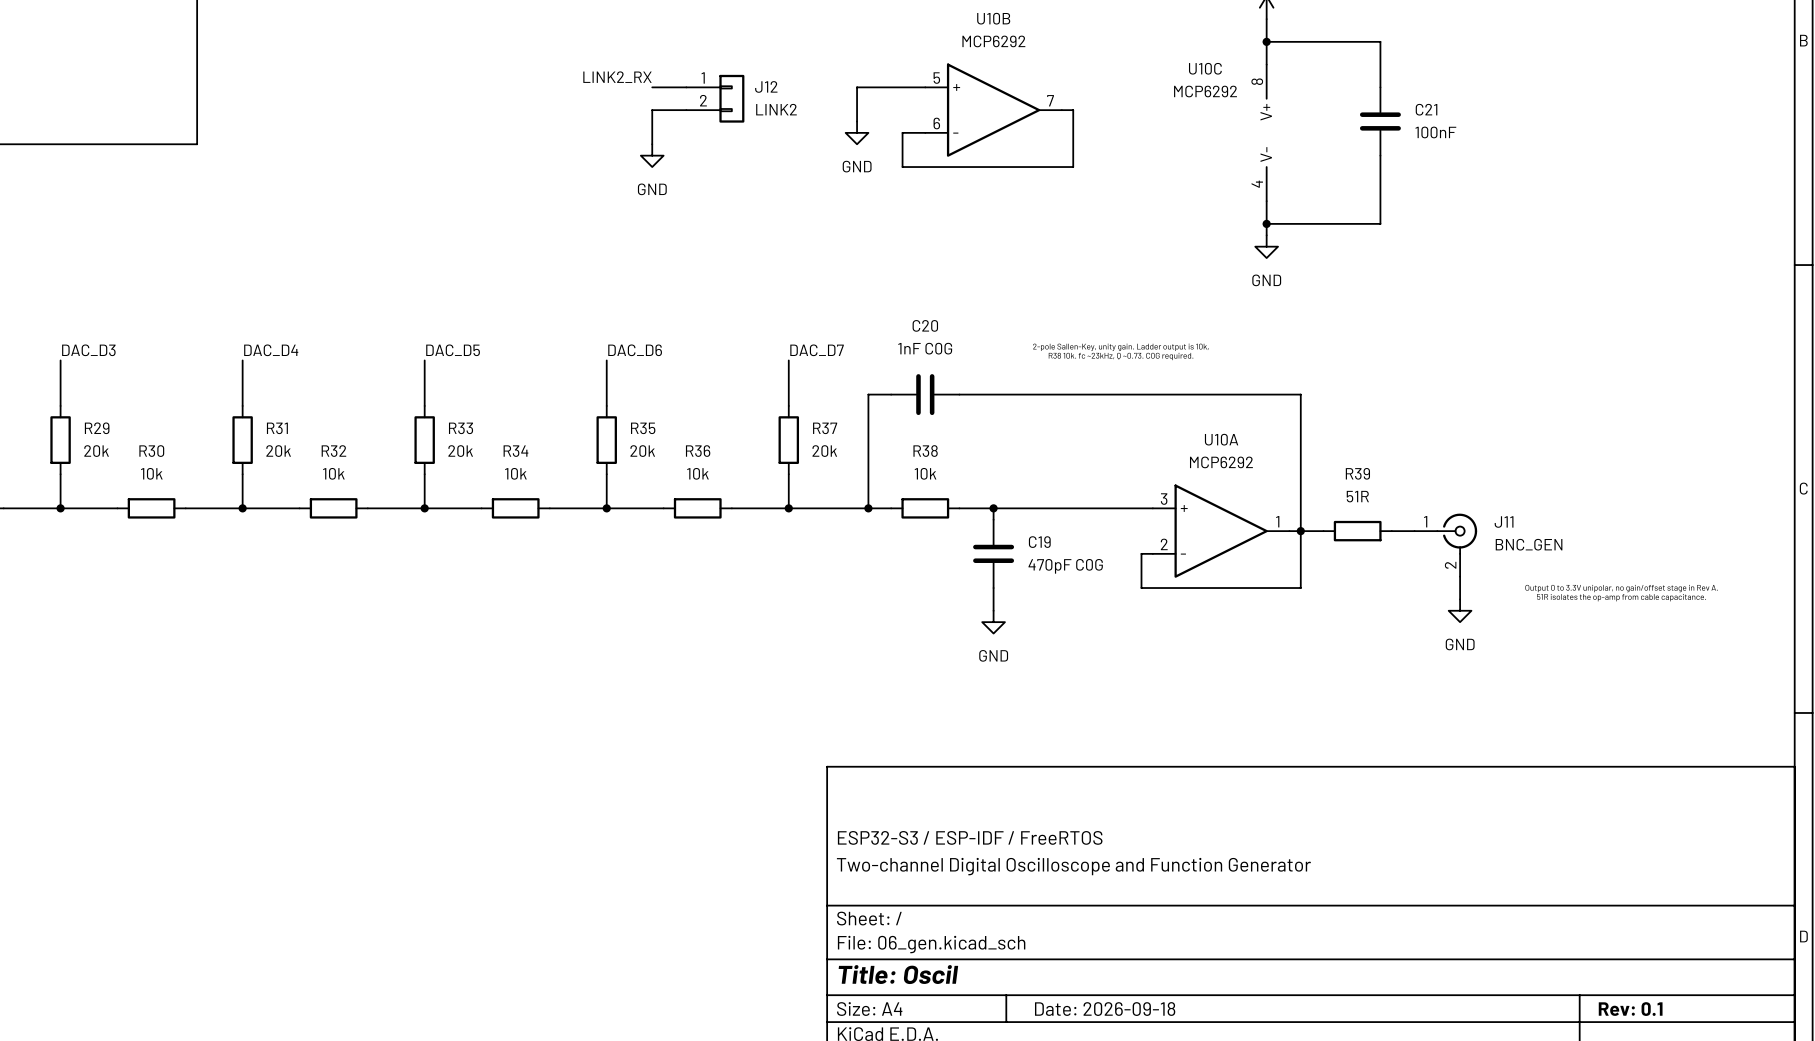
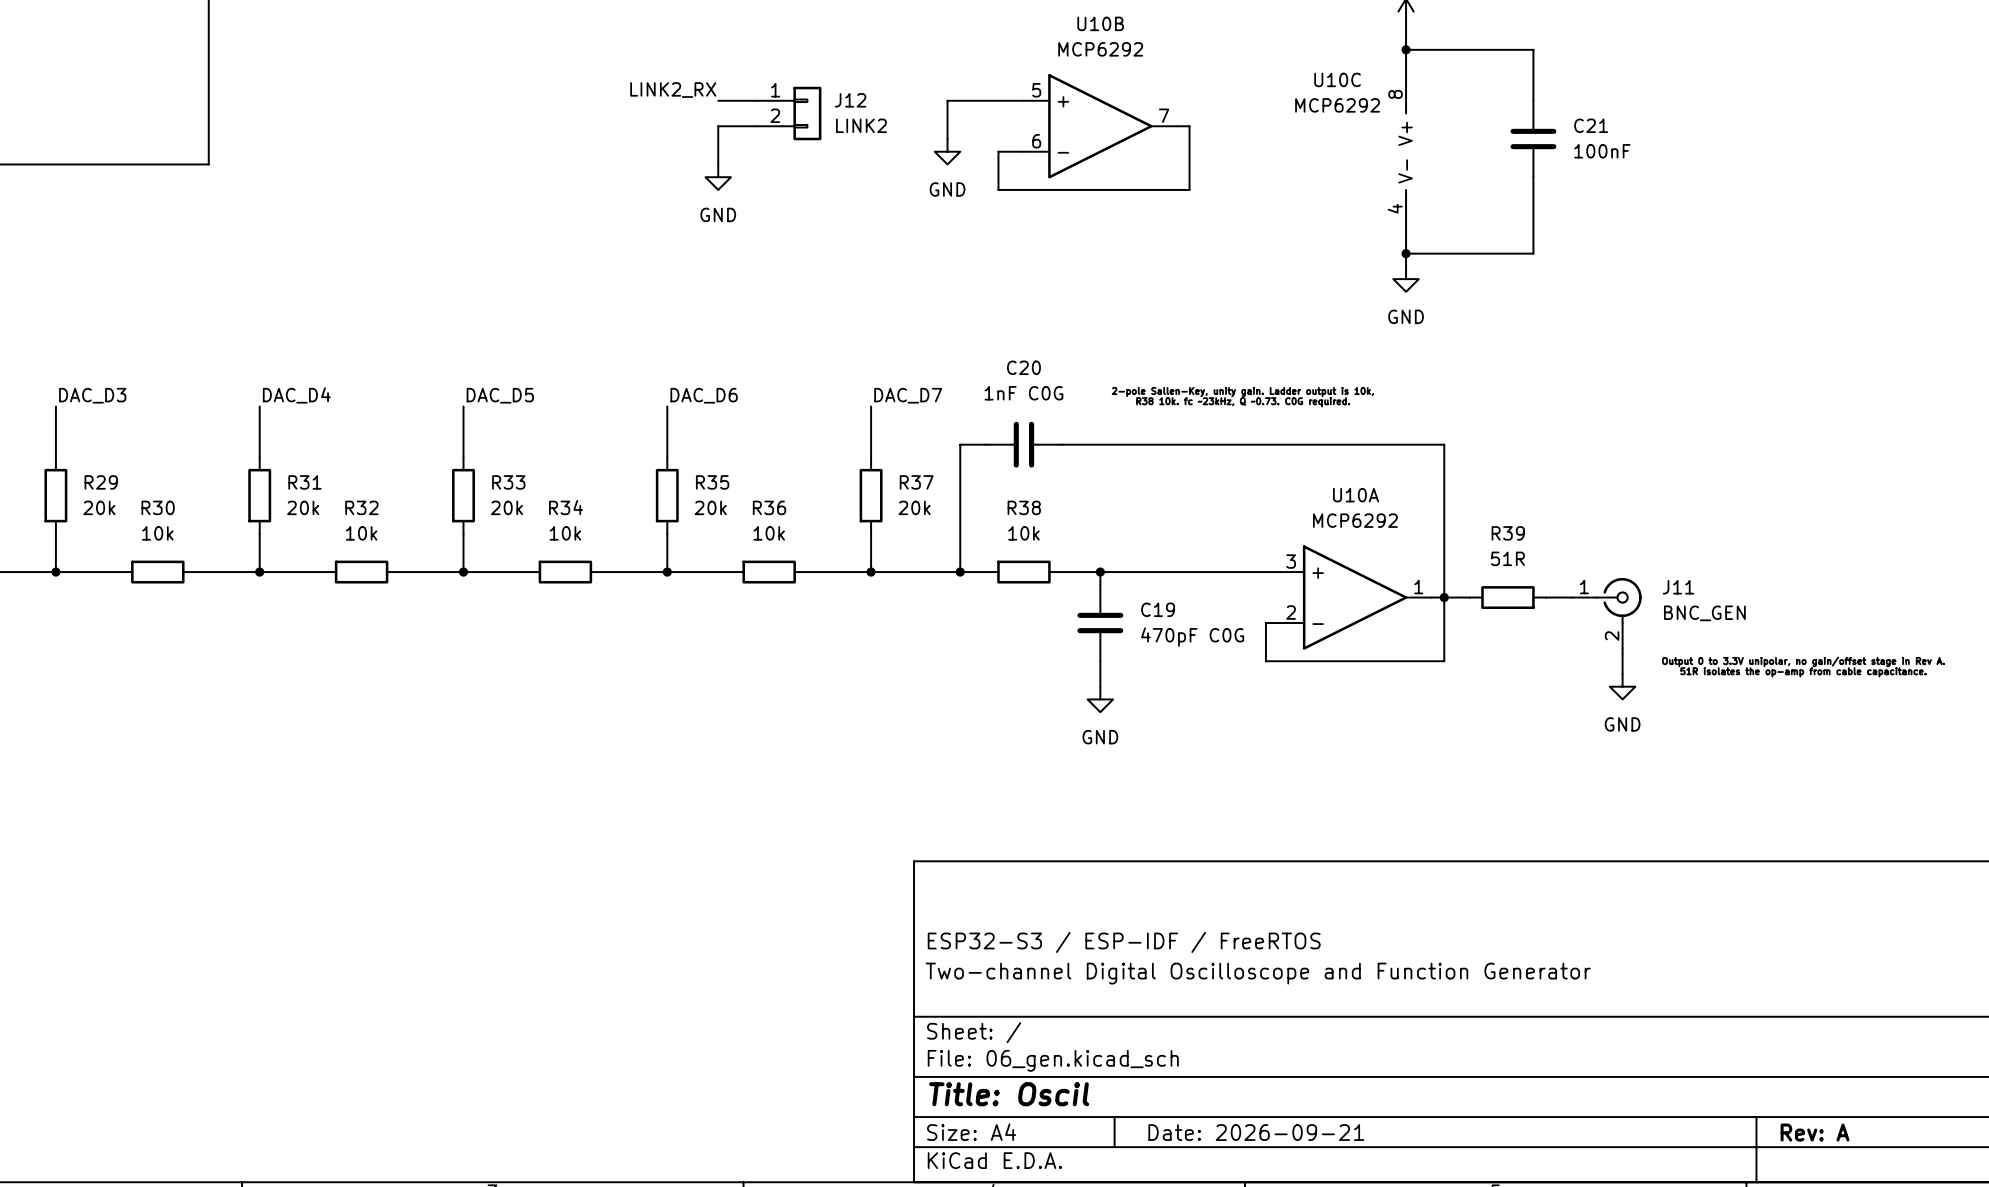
title block: Date: 2026-09-18 (1105, 1009) -> Date: 2026-09-21 (1256, 1132)
title block: Rev: 0.1 (1630, 1009) -> Rev: A (1815, 1132)

